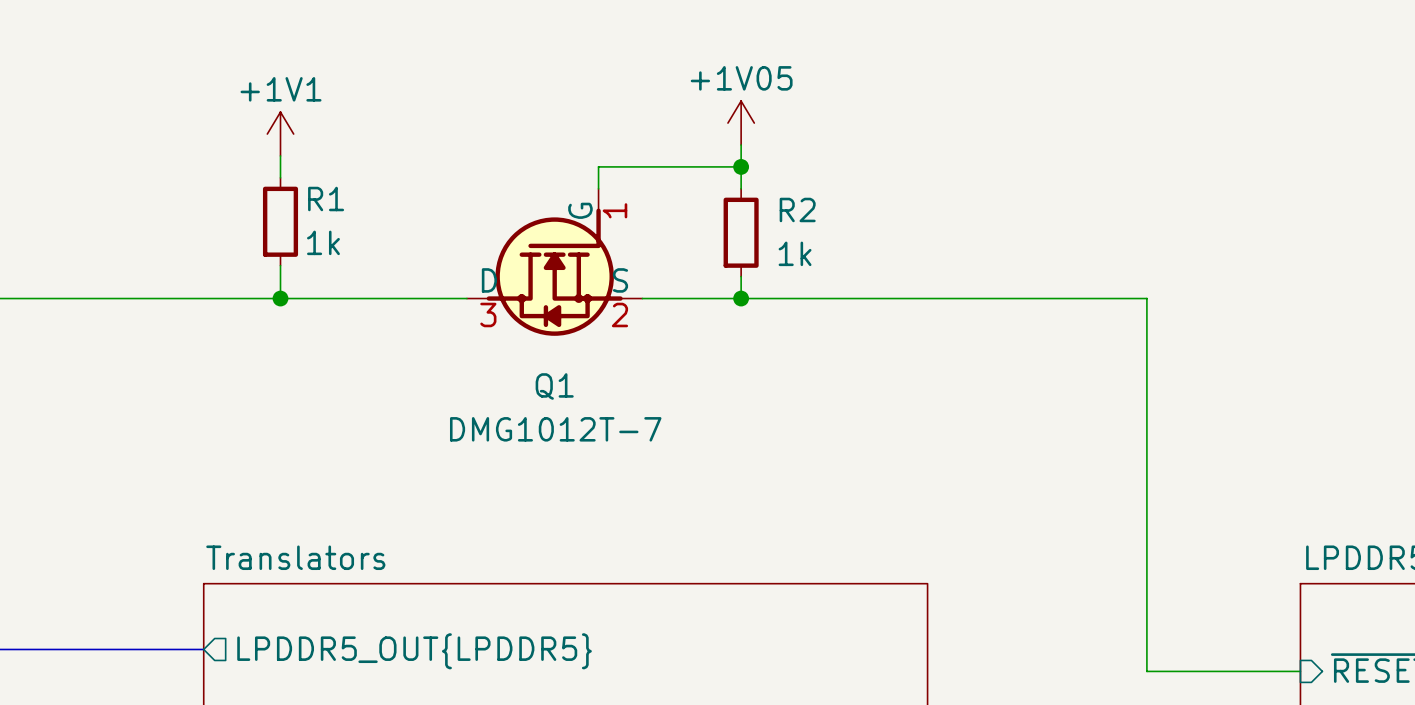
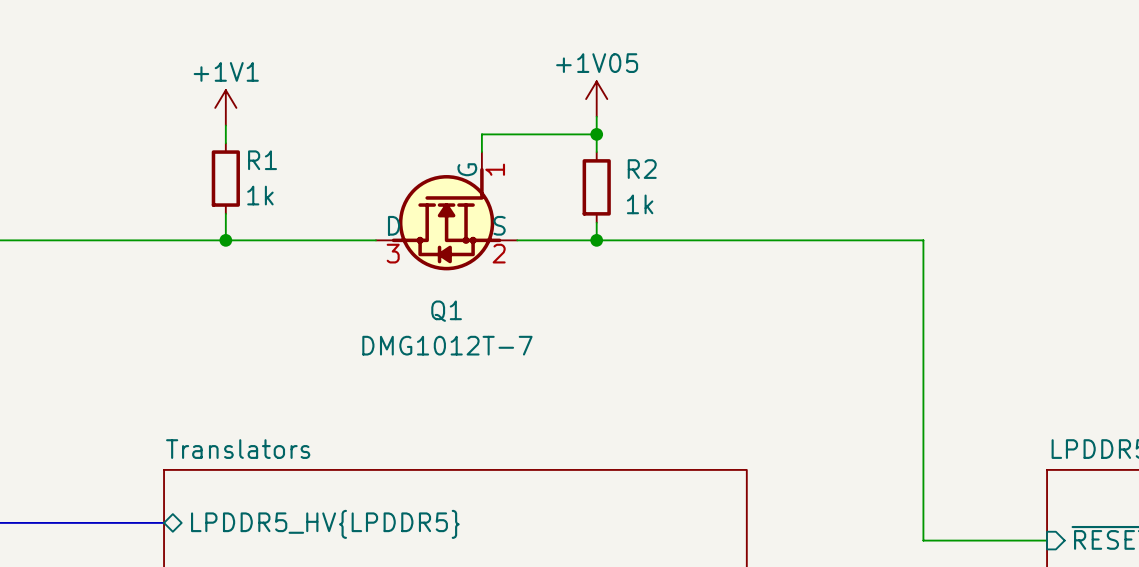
sheet pin shape: output (414, 651) -> bidirectional (325, 524)
sheet pin: LPDDR5_OUT{LPDDR5} (414, 651) -> LPDDR5_HV{LPDDR5} (325, 524)

